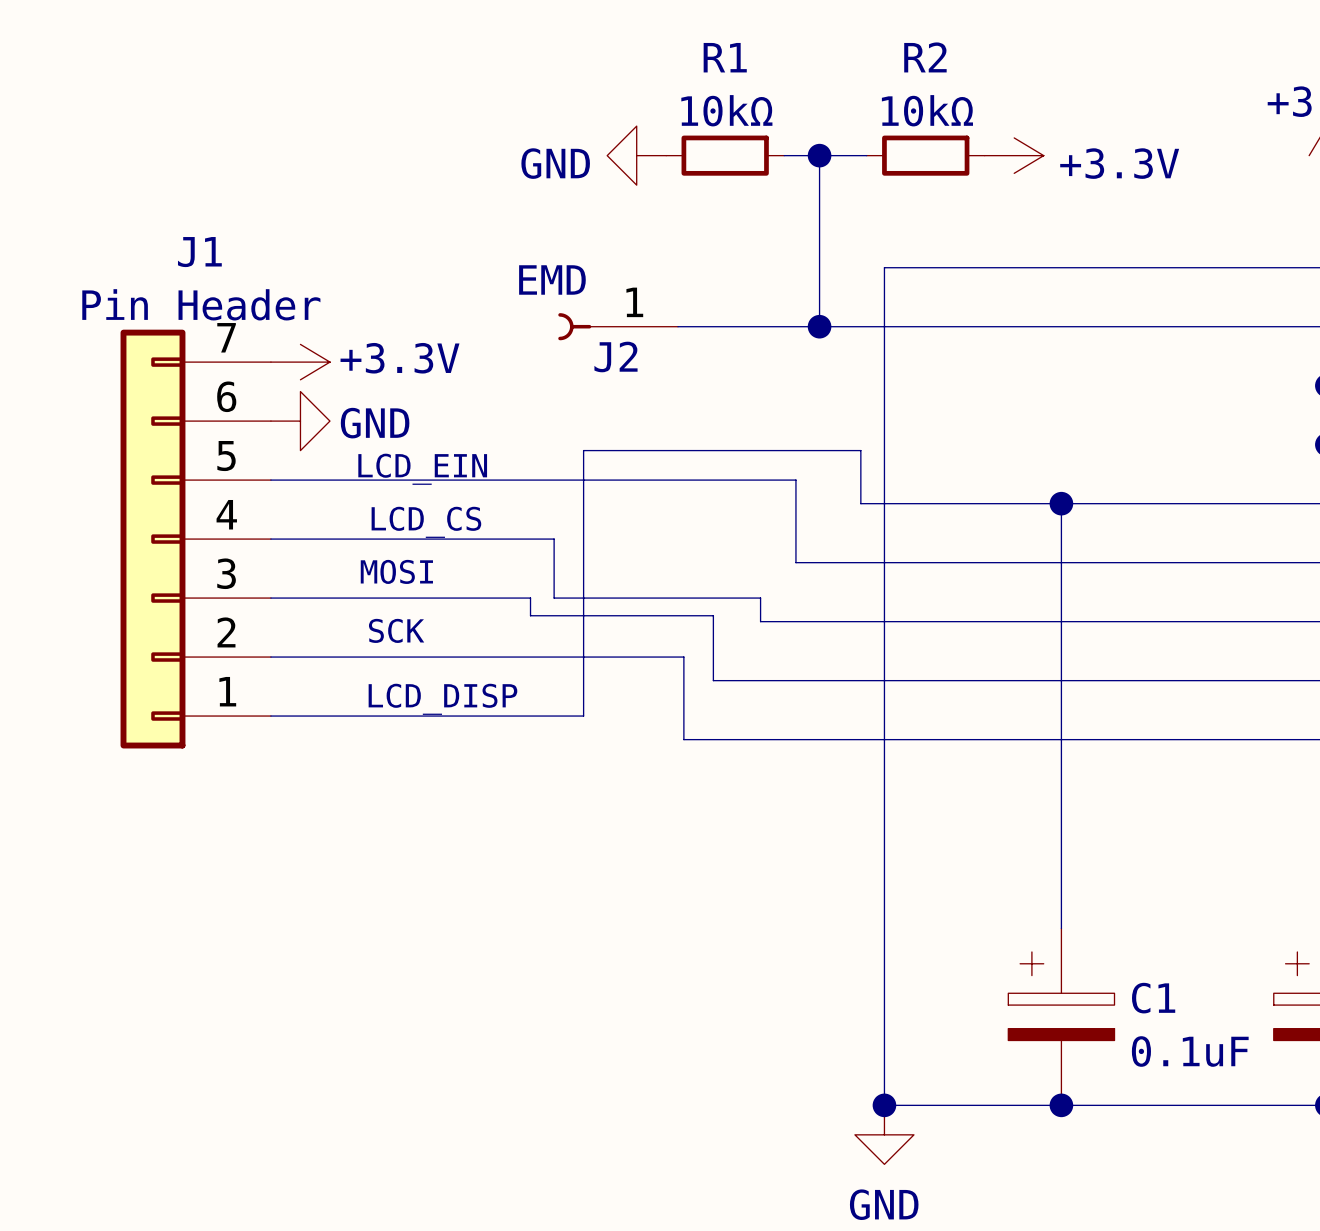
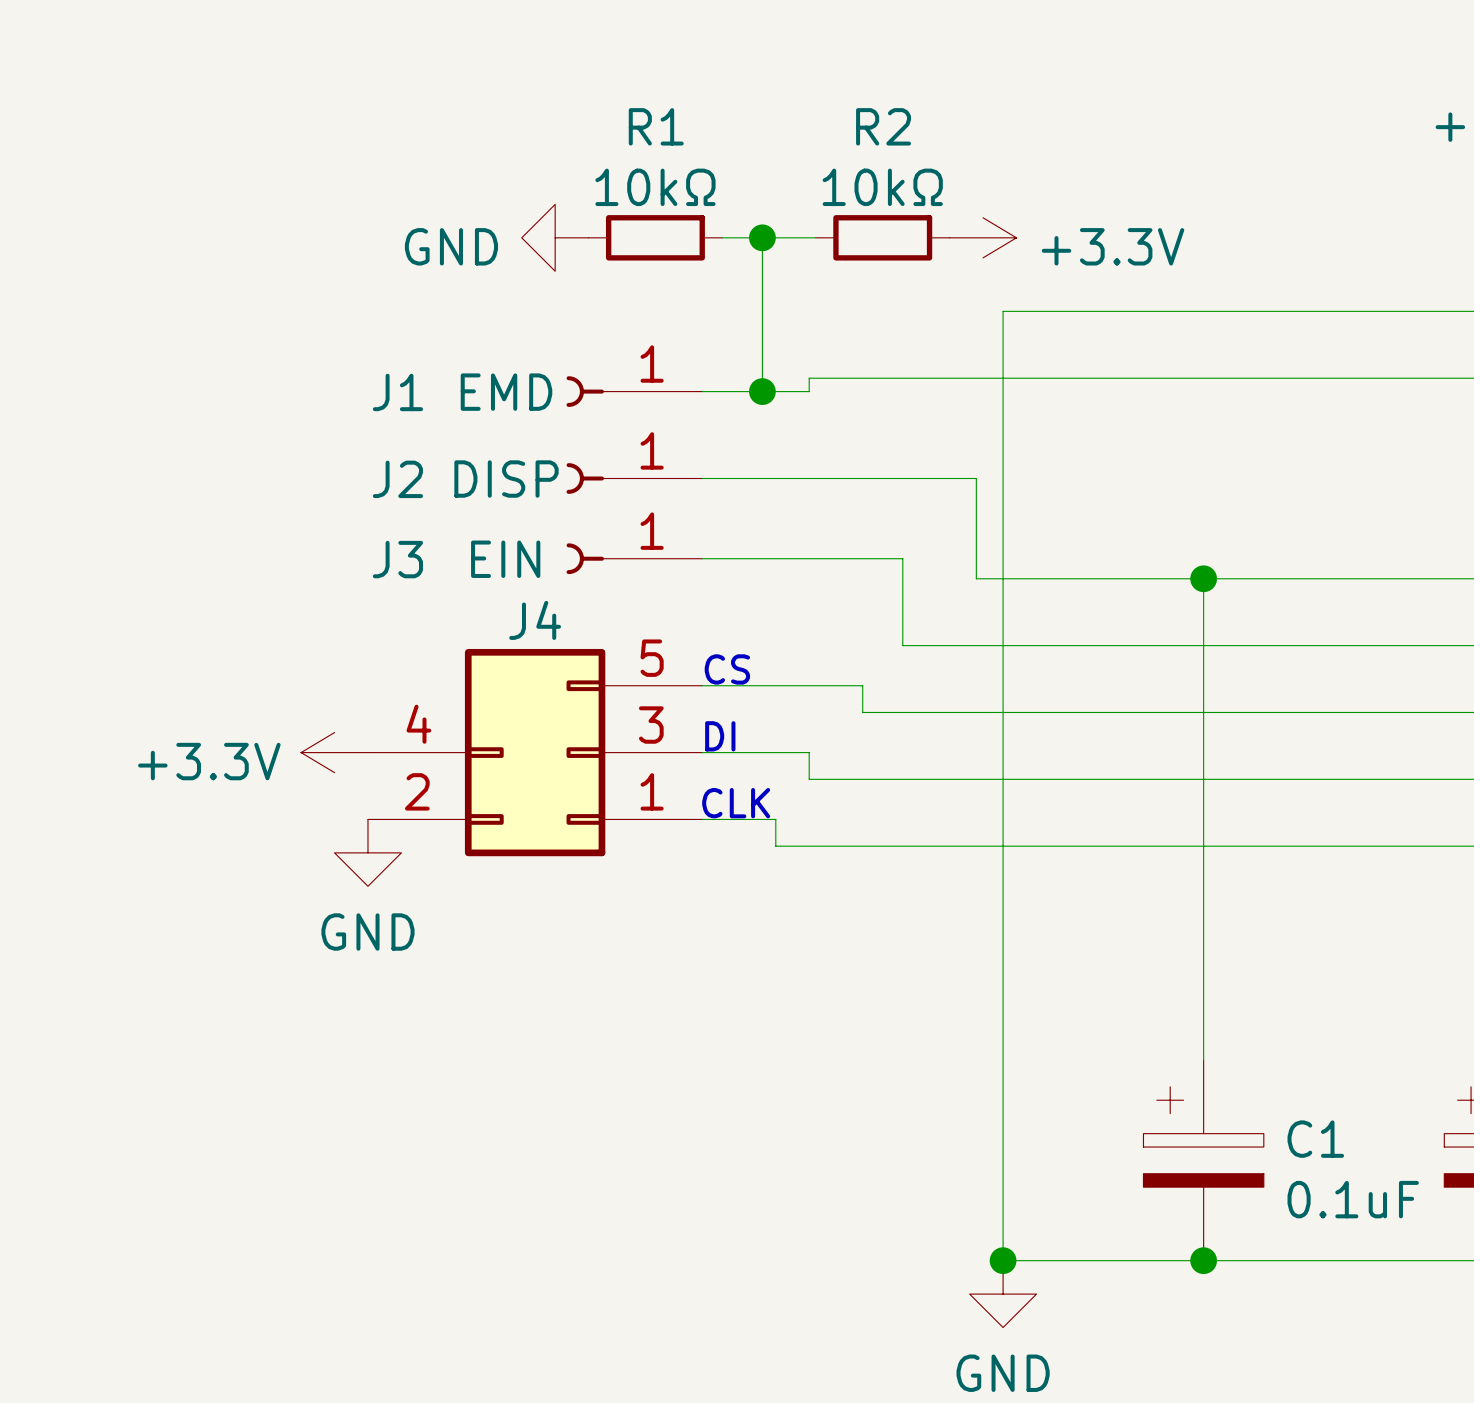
power symbol: GND (636, 155) -> none
R1 position: (725, 155) -> (655, 237)
wire: (784, 155) (866, 155) -> (722, 237) (815, 237)
wire: (819, 155) (819, 326) -> none
junction: (819, 155) -> none
R2 position: (925, 155) -> (882, 237)
power symbol position: +3.3V (1014, 155) -> +3.3V (983, 237)
power symbol: none -> GND (555, 237)
wire: none -> (762, 237) (762, 391)
junction: none -> (762, 237)
J1 name position: J1 (199, 252) -> J1 (397, 392)
J2 value: EMD (552, 279) -> DISP (506, 479)
J1 value: Pin Header (201, 304) -> EMD (506, 392)
J2 position: (618, 326) -> (634, 478)
wire: (677, 326) (713, 326) -> (702, 391) (809, 391) (809, 378)
junction: (819, 326) -> none
J1 symbol: [120, 329, 271, 749] -> [566, 376, 703, 407]
junction: none -> (762, 391)
J2 name position: J2 (616, 356) -> J2 (397, 479)
power symbol: +3.3V (300, 362) -> none
power symbol: GND (300, 421) -> none
wire: (860, 450) (583, 450) (583, 716) (270, 716) -> (976, 518) (976, 478) (702, 478)
text: LCD_EIN (422, 469) -> none
wire: (270, 480) (795, 480) (795, 485) -> (702, 558) (902, 558)
J3: none -> EIN (634, 558)
text: LCD_CS (426, 522) -> none
wire: (270, 539) (554, 539) (554, 598) (619, 598) -> none
text: MOSI (396, 571) -> none
text: none -> CS (727, 669)
wire: (270, 598) (530, 598) (530, 615) (713, 615) (713, 657) -> none
text: SCK (396, 630) -> none
text: none -> DI (720, 736)
power symbol: none -> +3.3V (334, 752)
J4: none -> (535, 752)
wire: (683, 657) (683, 716) -> (775, 752) (809, 752)
text: LCD_DISP (442, 699) -> none
text: none -> CLK (736, 803)
wire: none -> (702, 819) (775, 819)
power symbol: none -> GND (367, 852)

